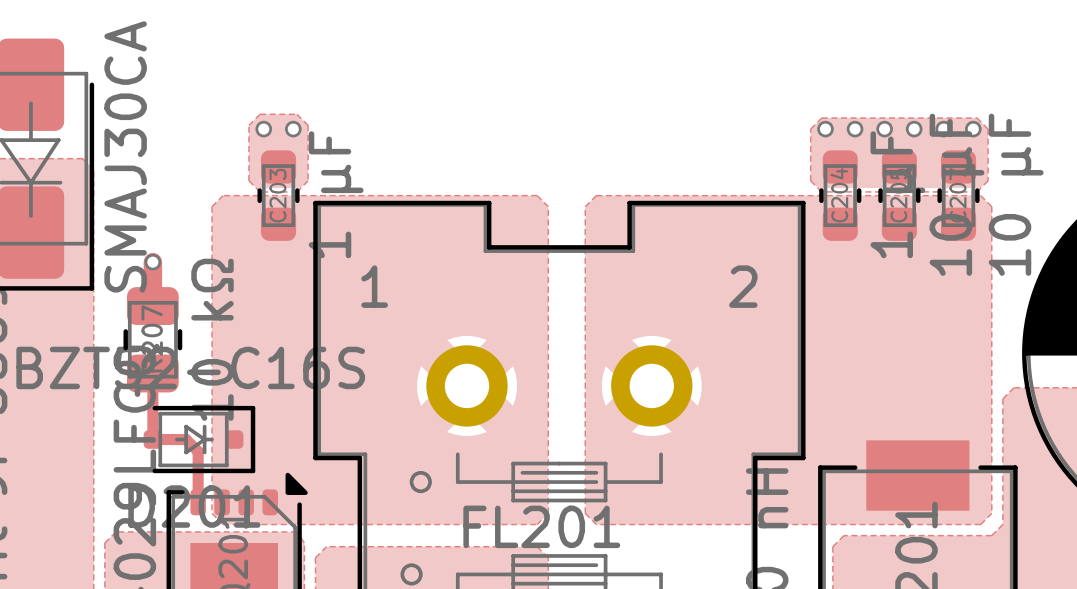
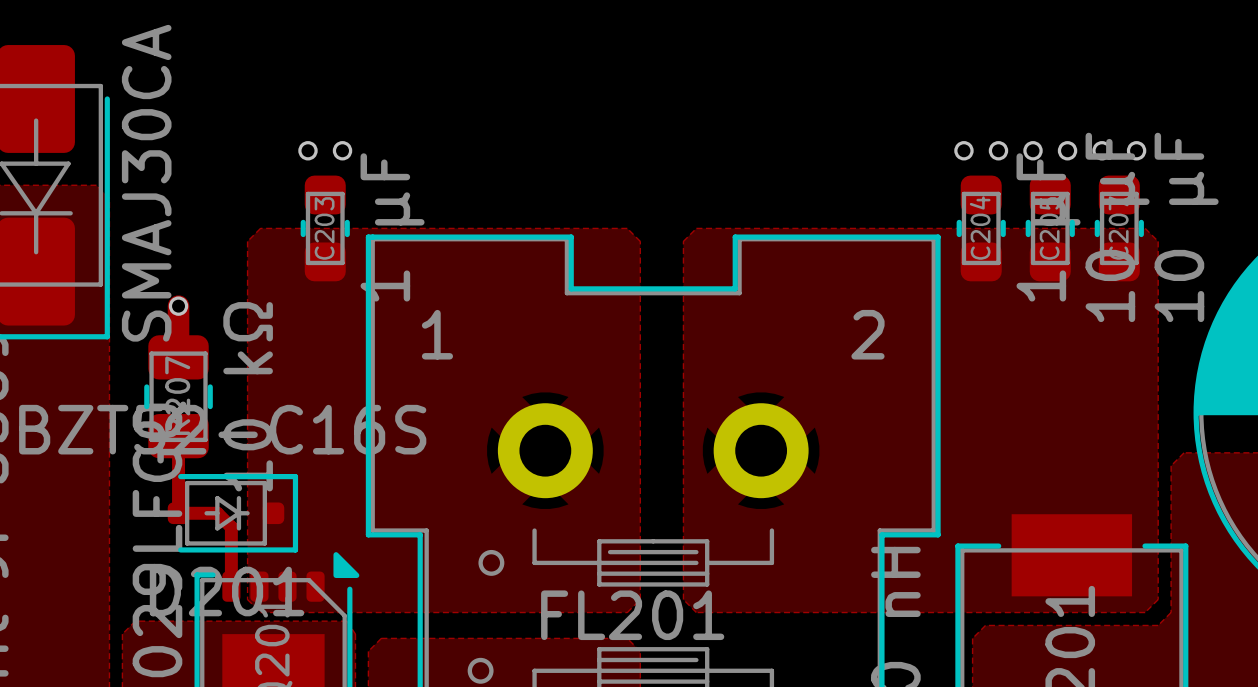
zone outline: (260, 114) (248, 125) (248, 180) (260, 191) (297, 191) (308, 180) (308, 125) (297, 114) (260, 114) -> none
zone outline: (821, 118) (810, 129) (810, 180) (821, 191) (977, 191) (988, 180) (988, 129) (977, 118) (821, 118) -> none

